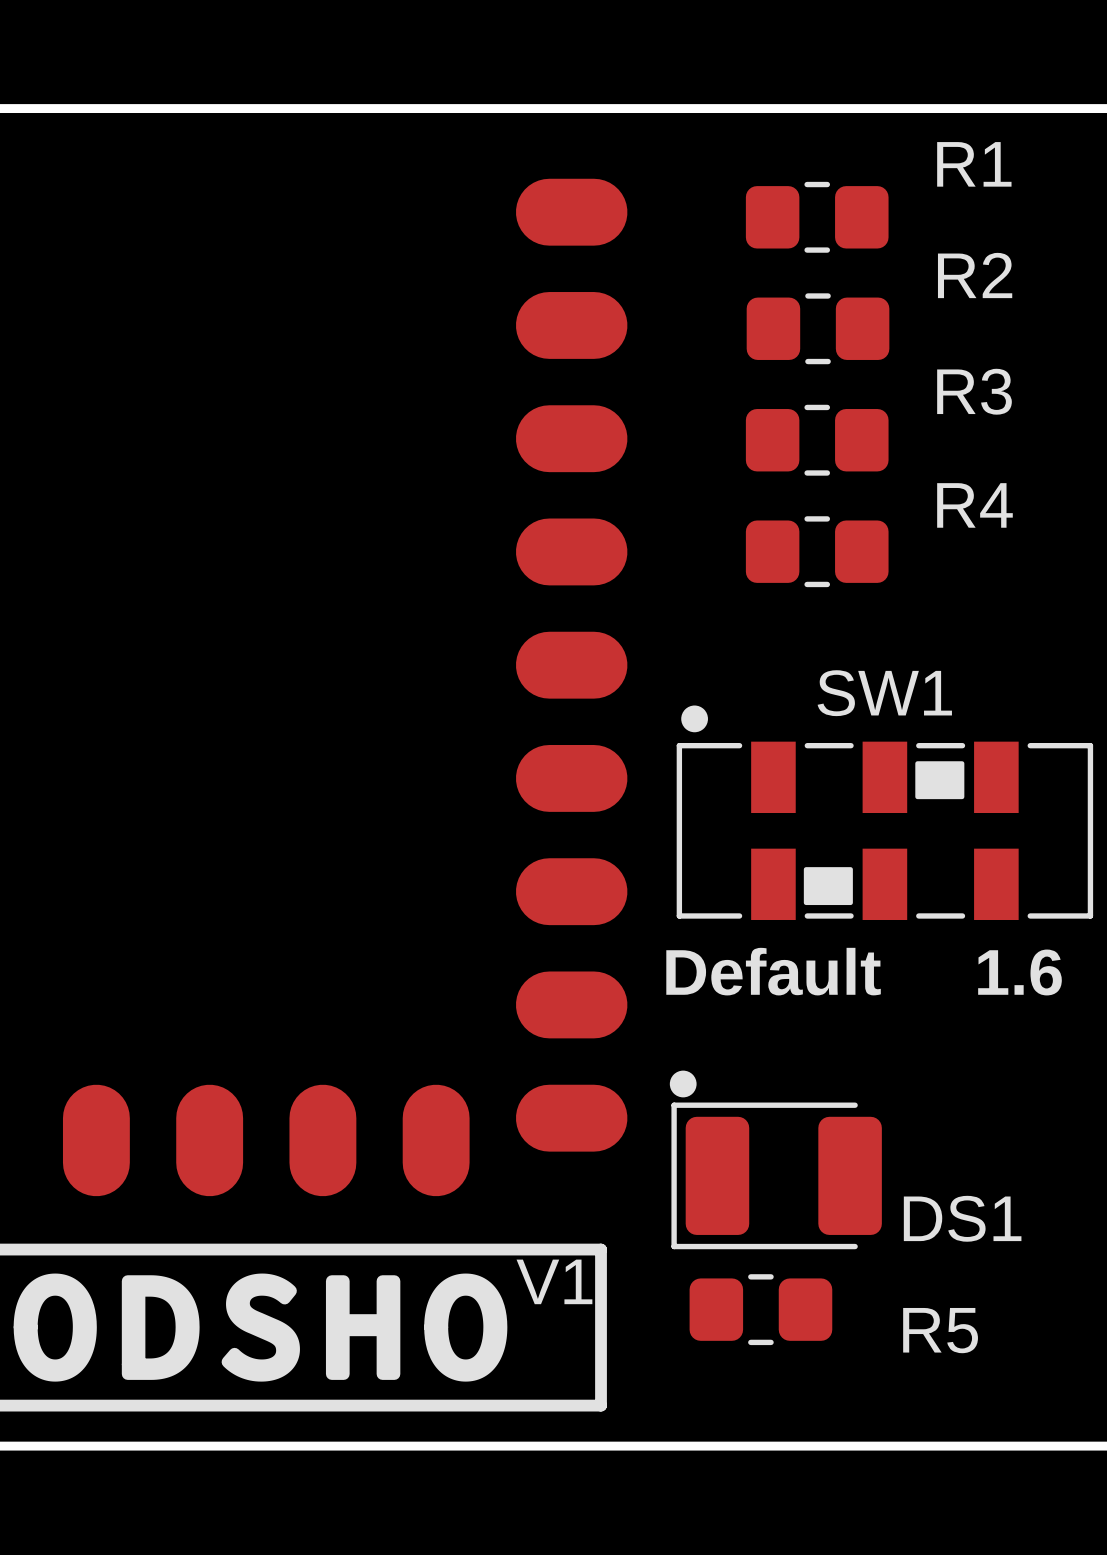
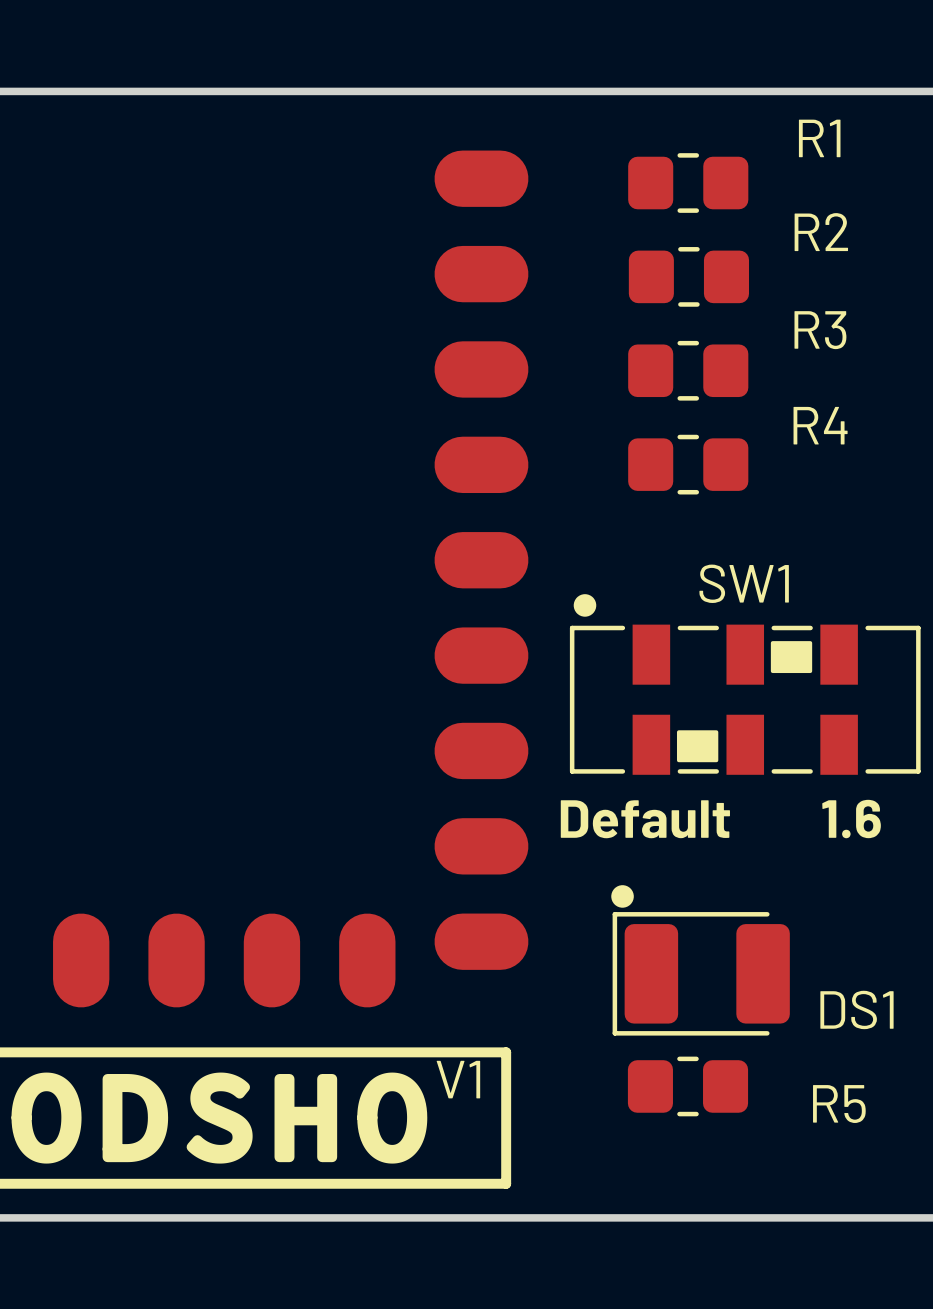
drawing position: (683, 1084) -> (622, 896)
DS1 position: (776, 1175) -> (701, 973)
R5 position: (760, 1309) -> (687, 1086)

